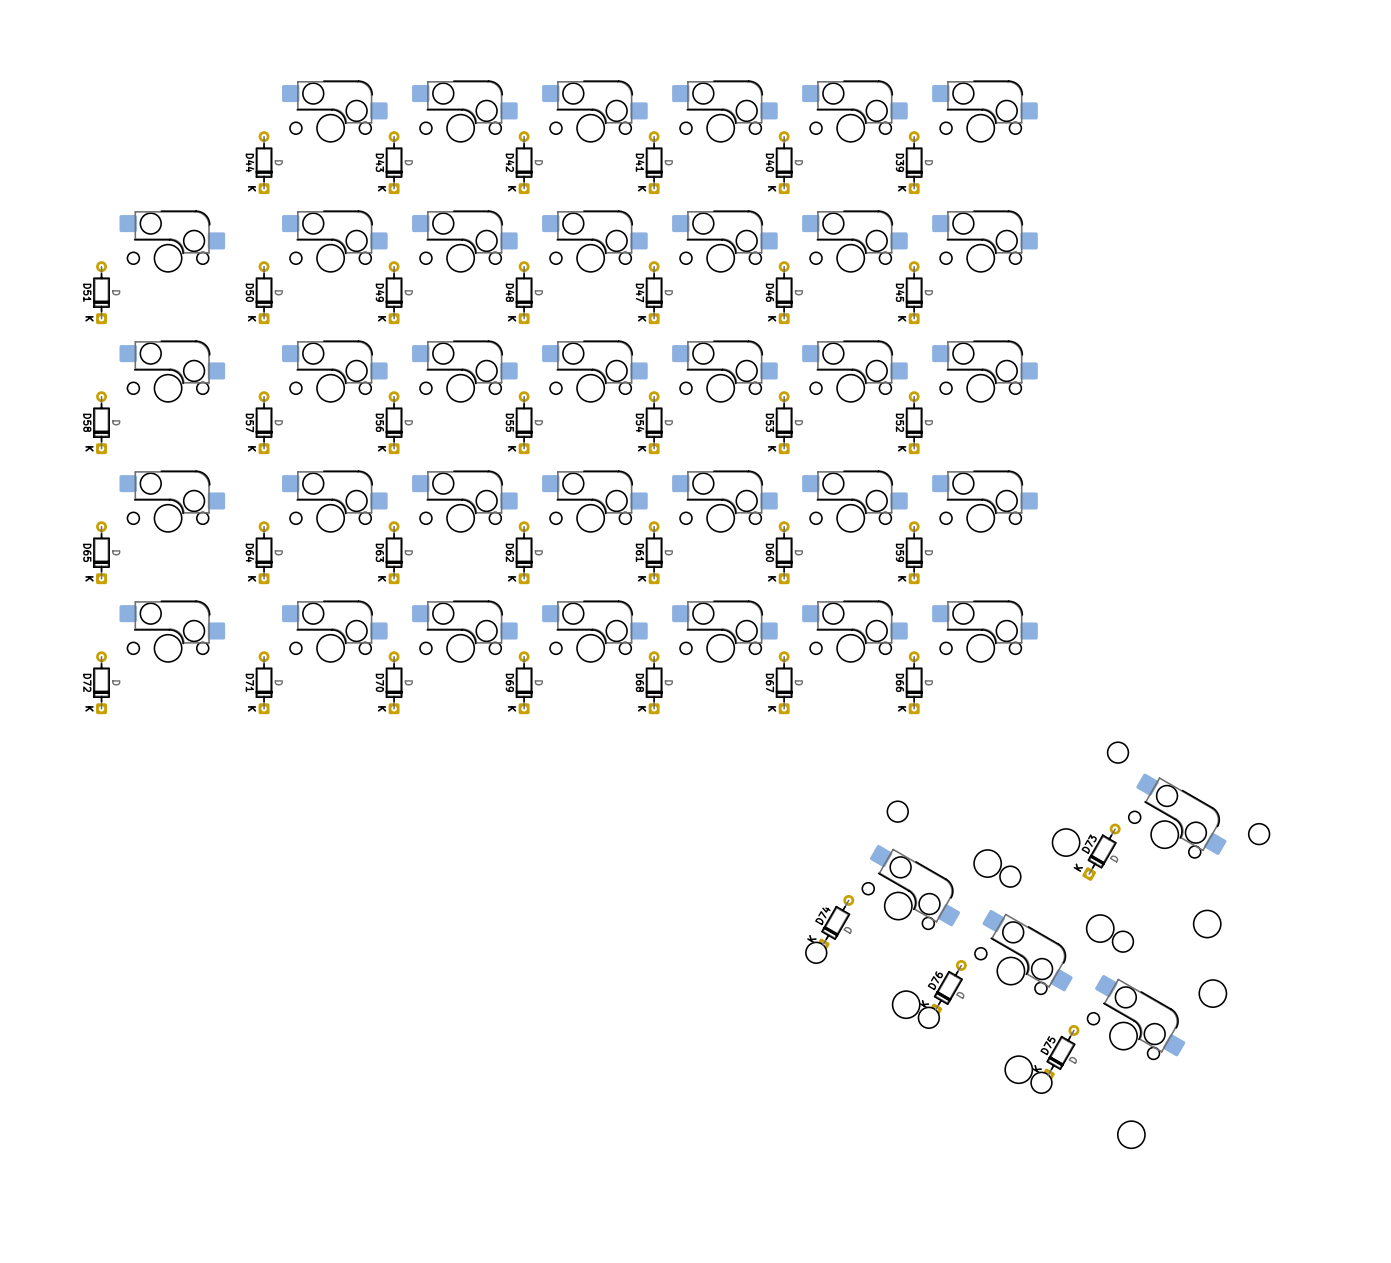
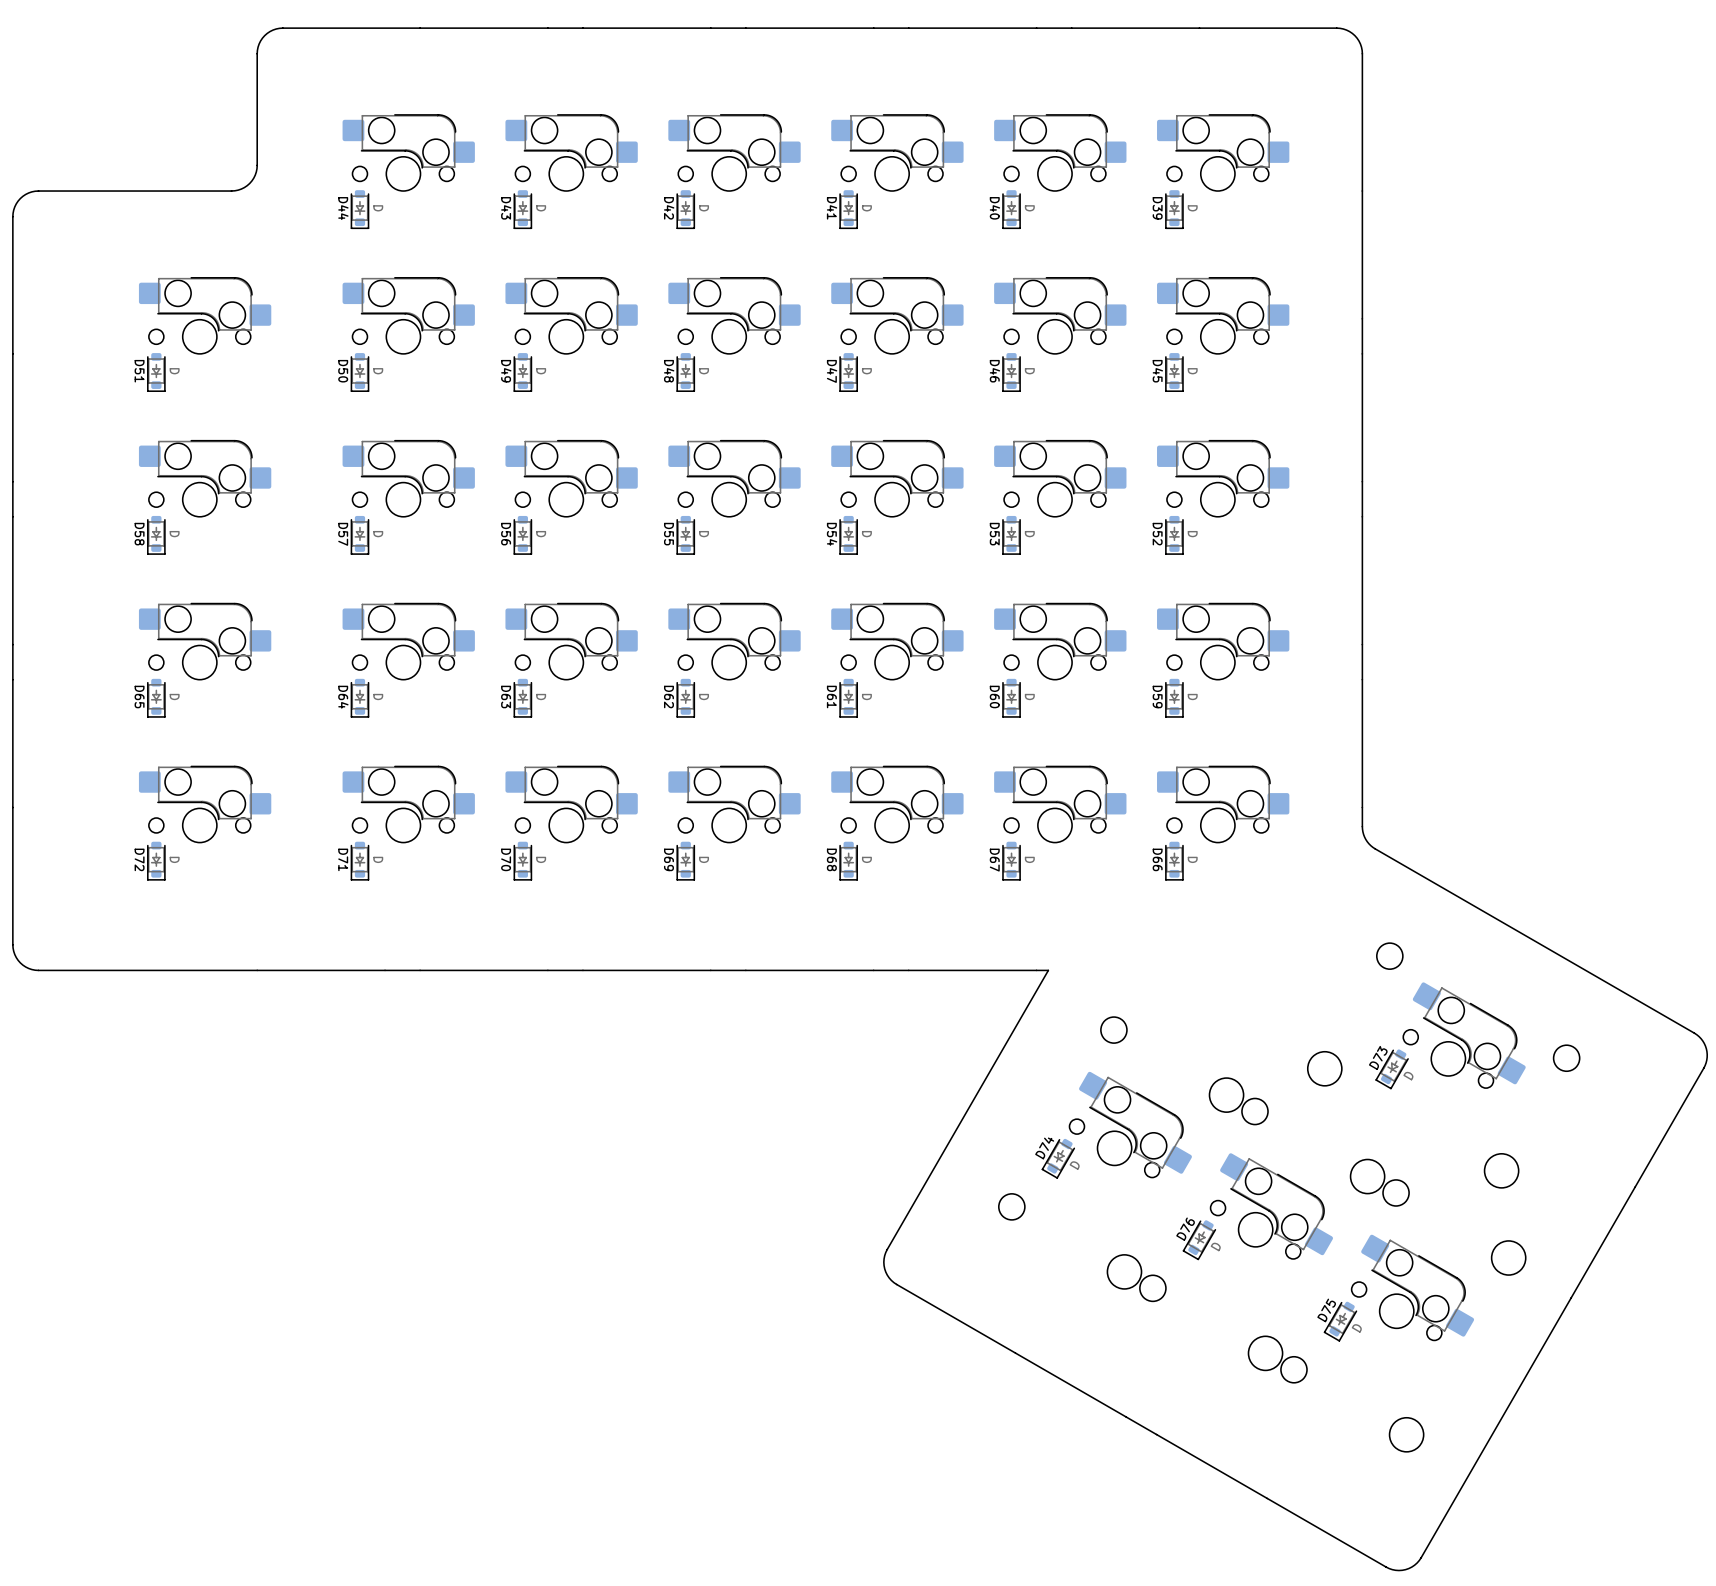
board edge: none -> (1336, 28) (279, 28) (264, 35) (258, 47) (256, 168) (253, 178) (244, 187) (231, 191) (38, 191) (22, 196) (16, 203) (12, 216) (12, 944) (18, 960) (28, 968) (38, 970) (1048, 970) (887, 1249) (883, 1262) (887, 1275) (896, 1284) (1386, 1567) (1402, 1570) (1414, 1565) (1421, 1557) (1703, 1068) (1707, 1054) (1702, 1040) (1694, 1033) (1375, 848) (1367, 841) (1363, 834) (1362, 53) (1360, 43) (1354, 35) (1346, 30) (1336, 28)
D44 footprint: [256, 131, 273, 195] -> [350, 190, 370, 229]
D43 footprint: [386, 131, 403, 195] -> [513, 190, 532, 229]
D42 footprint: [516, 131, 533, 195] -> [676, 190, 695, 229]
D41 footprint: [646, 131, 663, 195] -> [839, 190, 858, 229]
D40 footprint: [776, 131, 793, 195] -> [1002, 190, 1021, 229]
D39 footprint: [906, 131, 923, 195] -> [1165, 190, 1184, 229]
D51 footprint: [93, 261, 110, 325] -> [147, 353, 166, 392]
D50 footprint: [256, 261, 273, 325] -> [350, 353, 370, 392]
D49 footprint: [386, 261, 403, 325] -> [513, 353, 532, 392]
D48 footprint: [516, 261, 533, 325] -> [676, 353, 695, 392]
D47 footprint: [646, 261, 663, 325] -> [839, 353, 858, 392]
D46 footprint: [776, 261, 793, 325] -> [1002, 353, 1021, 392]
D45 footprint: [906, 261, 923, 325] -> [1165, 353, 1184, 392]
D58 footprint: [93, 391, 110, 455] -> [147, 515, 166, 555]
D57 footprint: [256, 391, 273, 455] -> [350, 515, 370, 555]
D56 footprint: [386, 391, 403, 455] -> [513, 515, 532, 555]
D55 footprint: [516, 391, 533, 455] -> [676, 515, 695, 555]
D54 footprint: [646, 391, 663, 455] -> [839, 515, 858, 555]
D53 footprint: [776, 391, 793, 455] -> [1002, 515, 1021, 555]
D52 footprint: [906, 391, 923, 455] -> [1165, 515, 1184, 555]
D65 footprint: [93, 521, 110, 585] -> [147, 678, 166, 718]
D64 footprint: [256, 521, 273, 585] -> [350, 678, 370, 718]
D63 footprint: [386, 521, 403, 585] -> [513, 678, 532, 718]
D62 footprint: [516, 521, 533, 585] -> [676, 678, 695, 718]
D61 footprint: [646, 521, 663, 585] -> [839, 678, 858, 718]
D60 footprint: [776, 521, 793, 585] -> [1002, 678, 1021, 718]
D59 footprint: [906, 521, 923, 585] -> [1165, 678, 1184, 718]
D72 footprint: [93, 651, 110, 715] -> [147, 841, 166, 881]
D71 footprint: [256, 651, 273, 715] -> [350, 841, 370, 881]
D70 footprint: [386, 651, 403, 715] -> [513, 841, 532, 881]
D69 footprint: [516, 651, 533, 715] -> [676, 841, 695, 881]
D68 footprint: [646, 651, 663, 715] -> [839, 841, 858, 881]
D67 footprint: [776, 651, 793, 715] -> [1002, 841, 1021, 881]
D66 footprint: [906, 651, 923, 715] -> [1165, 841, 1184, 881]
D73 footprint: [1082, 823, 1121, 881] -> [1375, 1049, 1409, 1090]
D74 footprint: [815, 894, 855, 953] -> [1041, 1138, 1075, 1179]
D76 footprint: [928, 959, 967, 1018] -> [1182, 1220, 1216, 1260]
D75 footprint: [1041, 1024, 1080, 1083] -> [1324, 1301, 1357, 1342]

